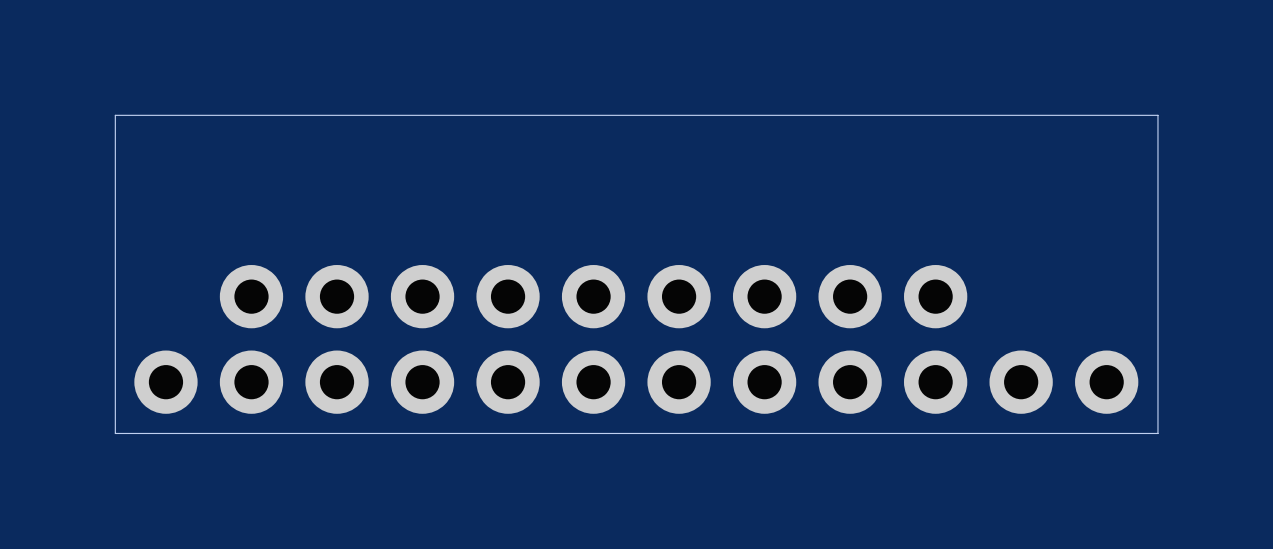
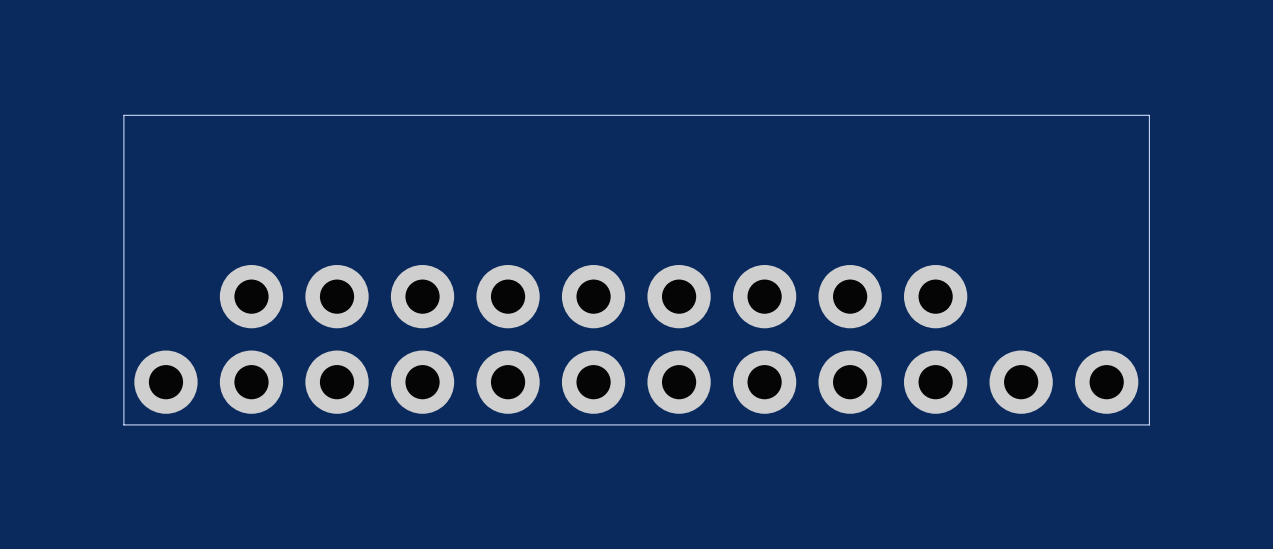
board edge: (1149, 115) (1157, 115) (1157, 433) (115, 433) (115, 115) (123, 115) -> (1149, 115) (1149, 424) (123, 424) (123, 115)

